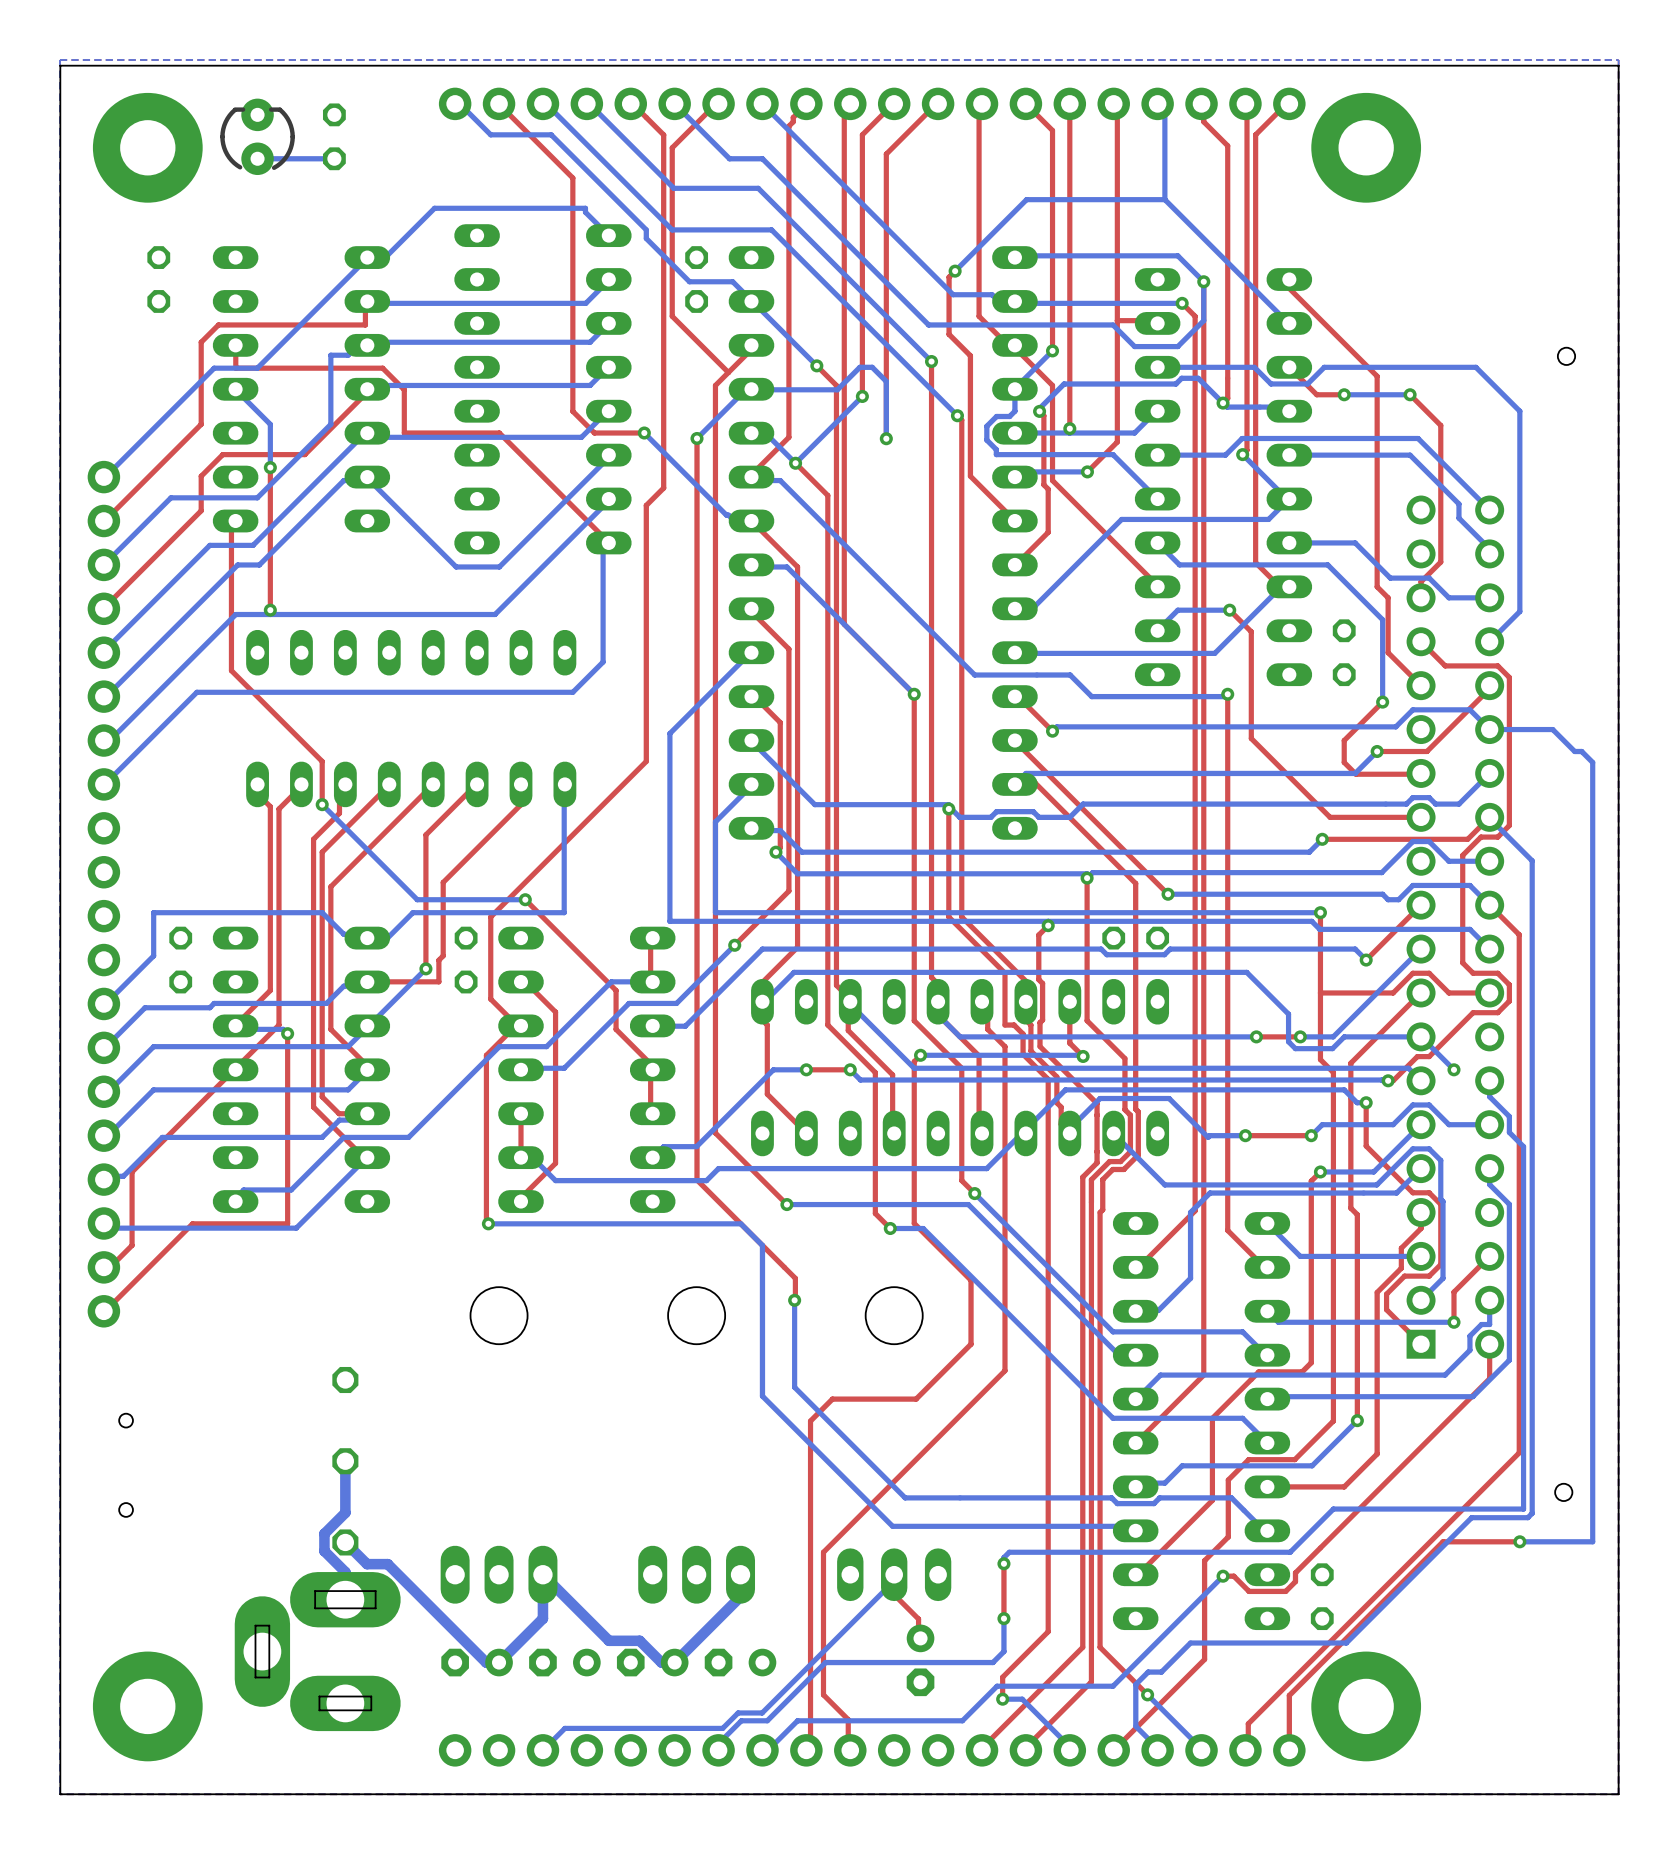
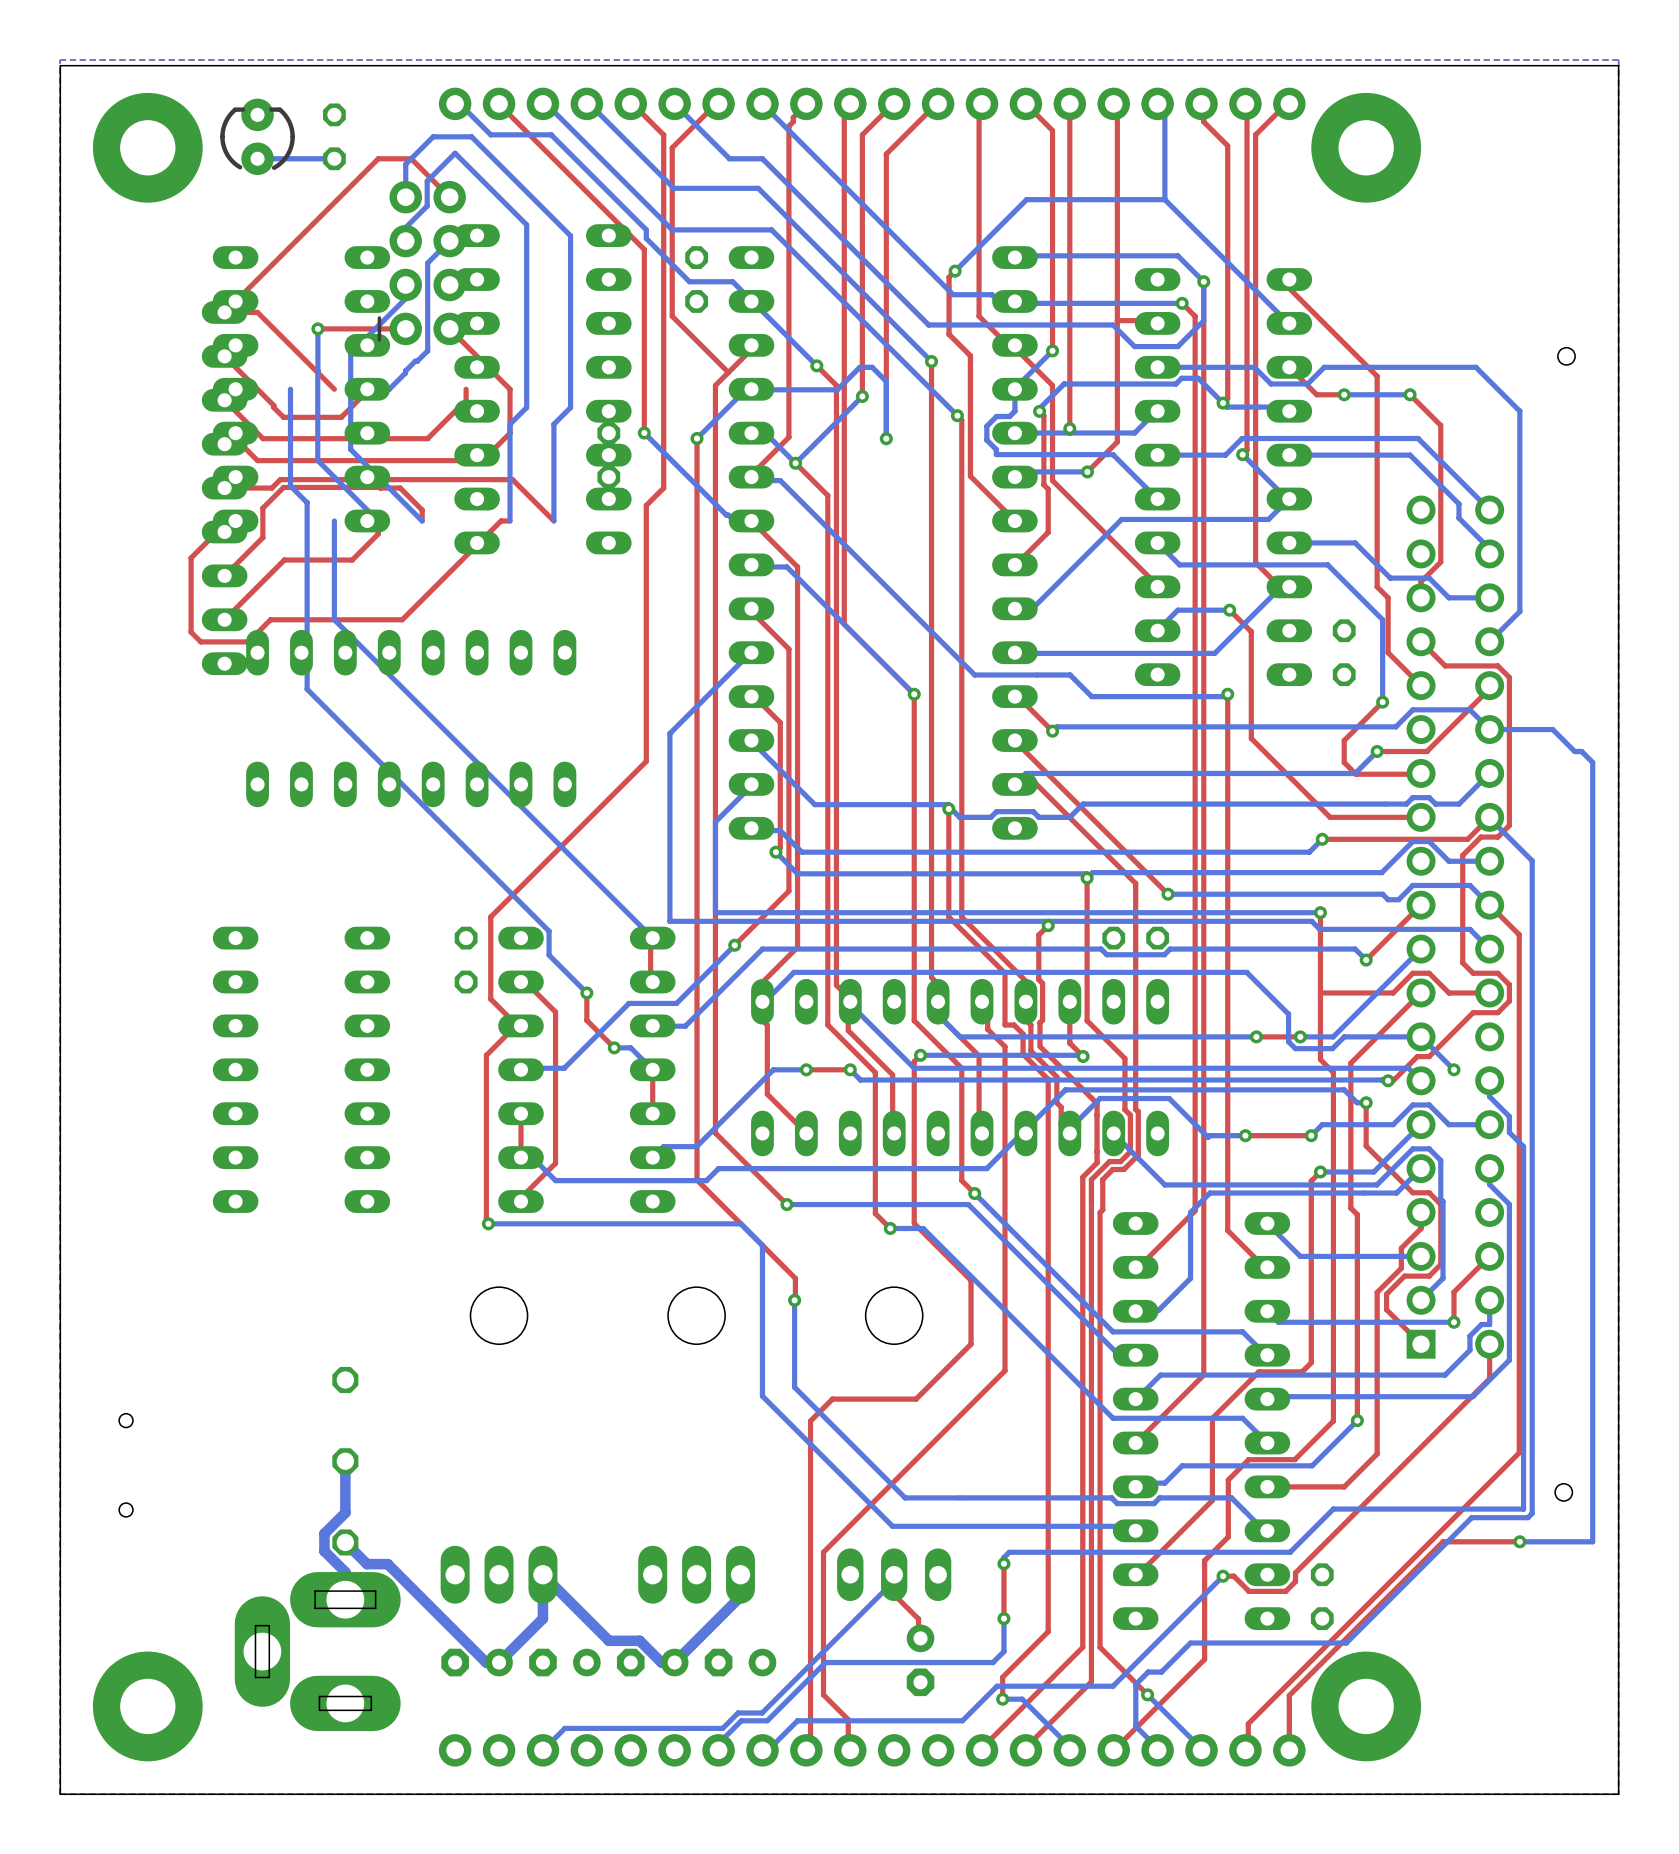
top track: (572, 178) (572, 411) (594, 433) (644, 433) -> (572, 178) (644, 249) (644, 433)
bottom track: none -> (405, 197) (405, 164) (433, 136) (471, 136) (570, 235) (570, 407) (553, 424) (553, 520)
top track: none -> (449, 197) (411, 158) (378, 158) (224, 312) (257, 312) (334, 389)
bottom track: (608, 235) (585, 212) (585, 208) (434, 208) (387, 255) (369, 255) (367, 257) (257, 368) (214, 368) (103, 477) -> none
bottom track: none -> (405, 241) (405, 227) (427, 206) (427, 181) (455, 153) (526, 224) (526, 407) (510, 424) (510, 520)
bottom track: none -> (449, 241) (427, 263) (427, 350) (389, 389) (378, 389)
part: none -> (421, 263)
part: (158, 279) -> none
bottom track: (608, 279) (585, 303) (369, 303) (367, 301) -> none
bottom track: none -> (405, 285) (405, 298) (350, 353) (350, 449) (422, 520)
top track: (367, 301) (365, 303) (365, 324) (218, 324) (201, 342) (201, 424) (103, 520) -> none
bottom track: (608, 323) (590, 342) (369, 342) (365, 346) (356, 346) (348, 355) (330, 355) (330, 424) (257, 497) (170, 497) (103, 564) -> none
bottom track: none -> (317, 328) (317, 370)
via: none -> (317, 328)
top track: none -> (405, 328) (317, 328)
top track: none -> (449, 328) (510, 389) (510, 433) (482, 460) (257, 460) (241, 444) (224, 444)
top track: (235, 345) (235, 368) (382, 368) (404, 389) (404, 433) (499, 433) (608, 542) -> none
top track: none -> (224, 356) (283, 417) (341, 417) (369, 389) (378, 389)
bottom track: (608, 367) (590, 385) (369, 385) (367, 389) -> none
bottom track: none -> (317, 370) (317, 460) (378, 520)
bottom track: (235, 389) (270, 424) (270, 467) -> none
bottom track: none -> (290, 389) (290, 486) (307, 502) (307, 689) (549, 931) (549, 955) (586, 992)
top track: (367, 389) (365, 389) (365, 394) (304, 454) (222, 454) (201, 476) (201, 510) (103, 608) -> none
top track: none -> (466, 389) (466, 405) (460, 405) (427, 438) (263, 438) (224, 400)
bottom track: (608, 411) (581, 437) (369, 437) (367, 433) (365, 437) (361, 437) (253, 545) (209, 545) (103, 652) -> none
bottom track: (608, 455) (607, 458) (499, 566) (456, 566) (367, 477) (365, 480) (343, 480) (259, 564) (237, 564) (106, 696) (103, 696) -> none
part: none -> (608, 455)
top track: (270, 467) (270, 610) -> none
via: (270, 467) -> none
top track: none -> (224, 488) (271, 488) (280, 479) (512, 479) (553, 520)
part: none -> (224, 488)
bottom track: (608, 499) (495, 614) (235, 614) (110, 739) (103, 740) -> none
top track: (235, 520) (231, 523) (231, 670) (322, 761) (322, 804) -> none
bottom track: none -> (334, 520) (334, 619) (652, 938)
top track: none -> (378, 520) (378, 533) (352, 560) (284, 560) (224, 619)
top track: none -> (422, 520) (422, 510) (400, 488) (283, 487) (262, 508) (262, 537) (224, 575)
top track: none -> (510, 520) (501, 520) (402, 619) (270, 619) (248, 641) (200, 641) (191, 632) (191, 558) (217, 531) (224, 531)
bottom track: (608, 542) (607, 545) (603, 545) (603, 662) (572, 692) (196, 692) (103, 784) -> none
via: (270, 610) -> none
top track: (257, 784) (257, 793) (270, 806) (270, 990) (235, 1025) -> none
top track: (301, 784) (278, 808) (278, 1025) (132, 1171) (132, 1245) (106, 1271) (103, 1267) -> none
top track: (345, 784) (339, 791) (339, 813) (313, 839) (313, 1107) (365, 1159) (367, 1157) -> none
top track: (389, 784) (322, 852) (322, 1096) (339, 1113) (367, 1113) -> none
top track: (433, 784) (330, 886) (330, 1029) (365, 1063) (367, 1069) -> none
top track: (477, 784) (425, 834) (425, 968) -> none
top track: (520, 784) (520, 804) (443, 882) (443, 955) (438, 960) (438, 981) (367, 982) -> none
bottom track: (564, 784) (564, 912) (412, 912) (387, 938) (369, 938) (365, 934) (343, 934) (322, 912) (153, 912) (153, 955) (103, 1003) -> none
bottom track: (322, 804) (417, 899) (525, 899) -> none
via: (322, 804) -> none
part: (103, 894) -> none
top track: (525, 899) (616, 990) (616, 1029) (650, 1063) (652, 1069) (650, 1072) (650, 1111) (652, 1113) -> (652, 1069) (652, 1113)
via: (525, 899) -> none
part: (180, 960) -> none
bottom track: (425, 968) (348, 1046) (153, 1046) (110, 1089) (103, 1091) -> none
via: (425, 968) -> none
bottom track: (650, 981) (611, 981) (546, 1046) (499, 1046) (408, 1137) (343, 1137) (291, 1189) (243, 1189) (235, 1197) (235, 1201) -> none
bottom track: (367, 982) (365, 986) (343, 986) (326, 1003) (214, 1003) (209, 1007) (145, 1007) (103, 1047) -> none
top track: none -> (586, 992) (586, 1020) (614, 1047)
via: none -> (586, 992)
bottom track: (235, 1025) (235, 1029) (283, 1029) (287, 1033) -> none
top track: (287, 1033) (287, 1223) (192, 1223) (103, 1311) -> none
via: (287, 1033) -> none
bottom track: none -> (614, 1047) (630, 1047) (652, 1069)
via: none -> (614, 1047)
bottom track: (367, 1069) (348, 1089) (153, 1089) (110, 1133) (106, 1133) (103, 1135) -> none
bottom track: (367, 1113) (361, 1120) (339, 1120) (322, 1137) (162, 1137) (123, 1176) (106, 1176) (103, 1179) -> none
bottom track: (367, 1157) (296, 1228) (110, 1228) (103, 1223) -> none

